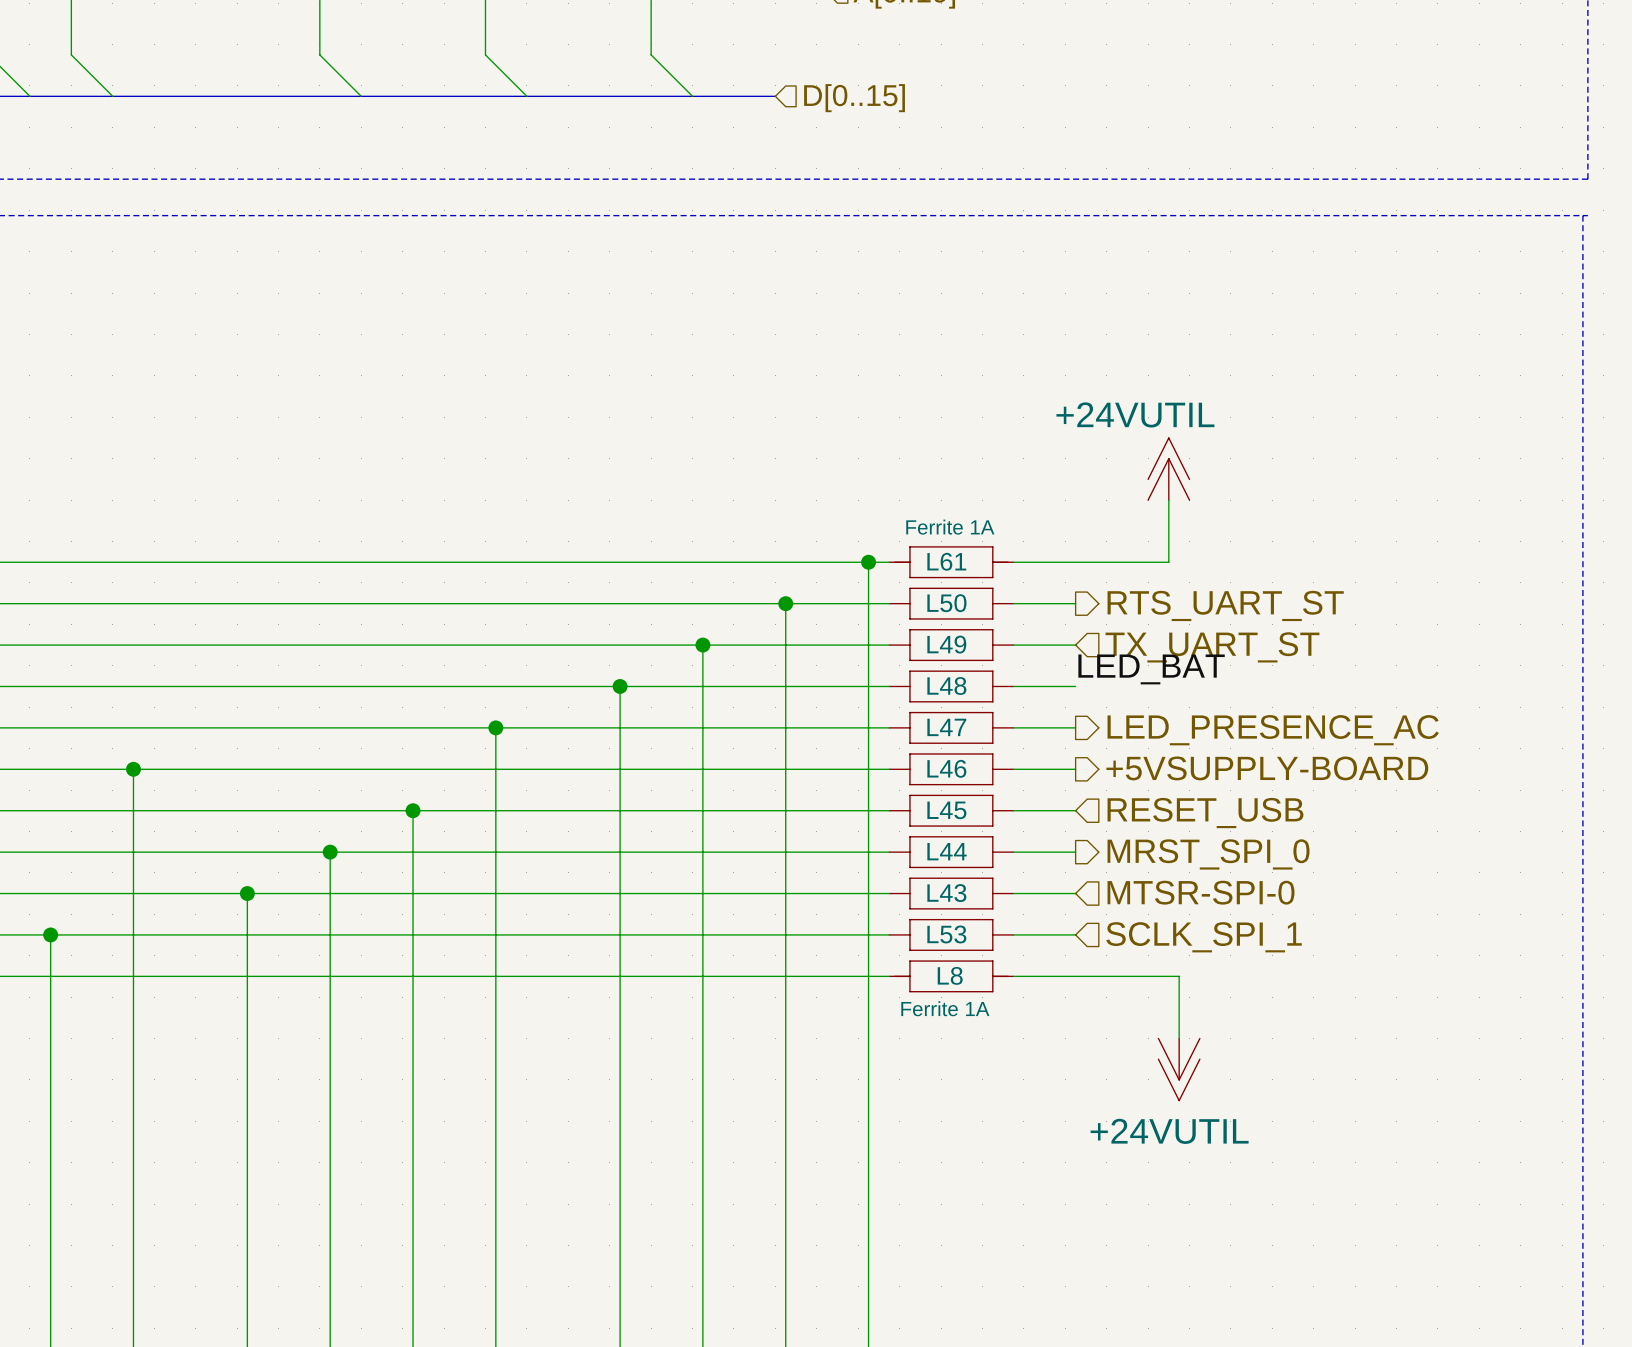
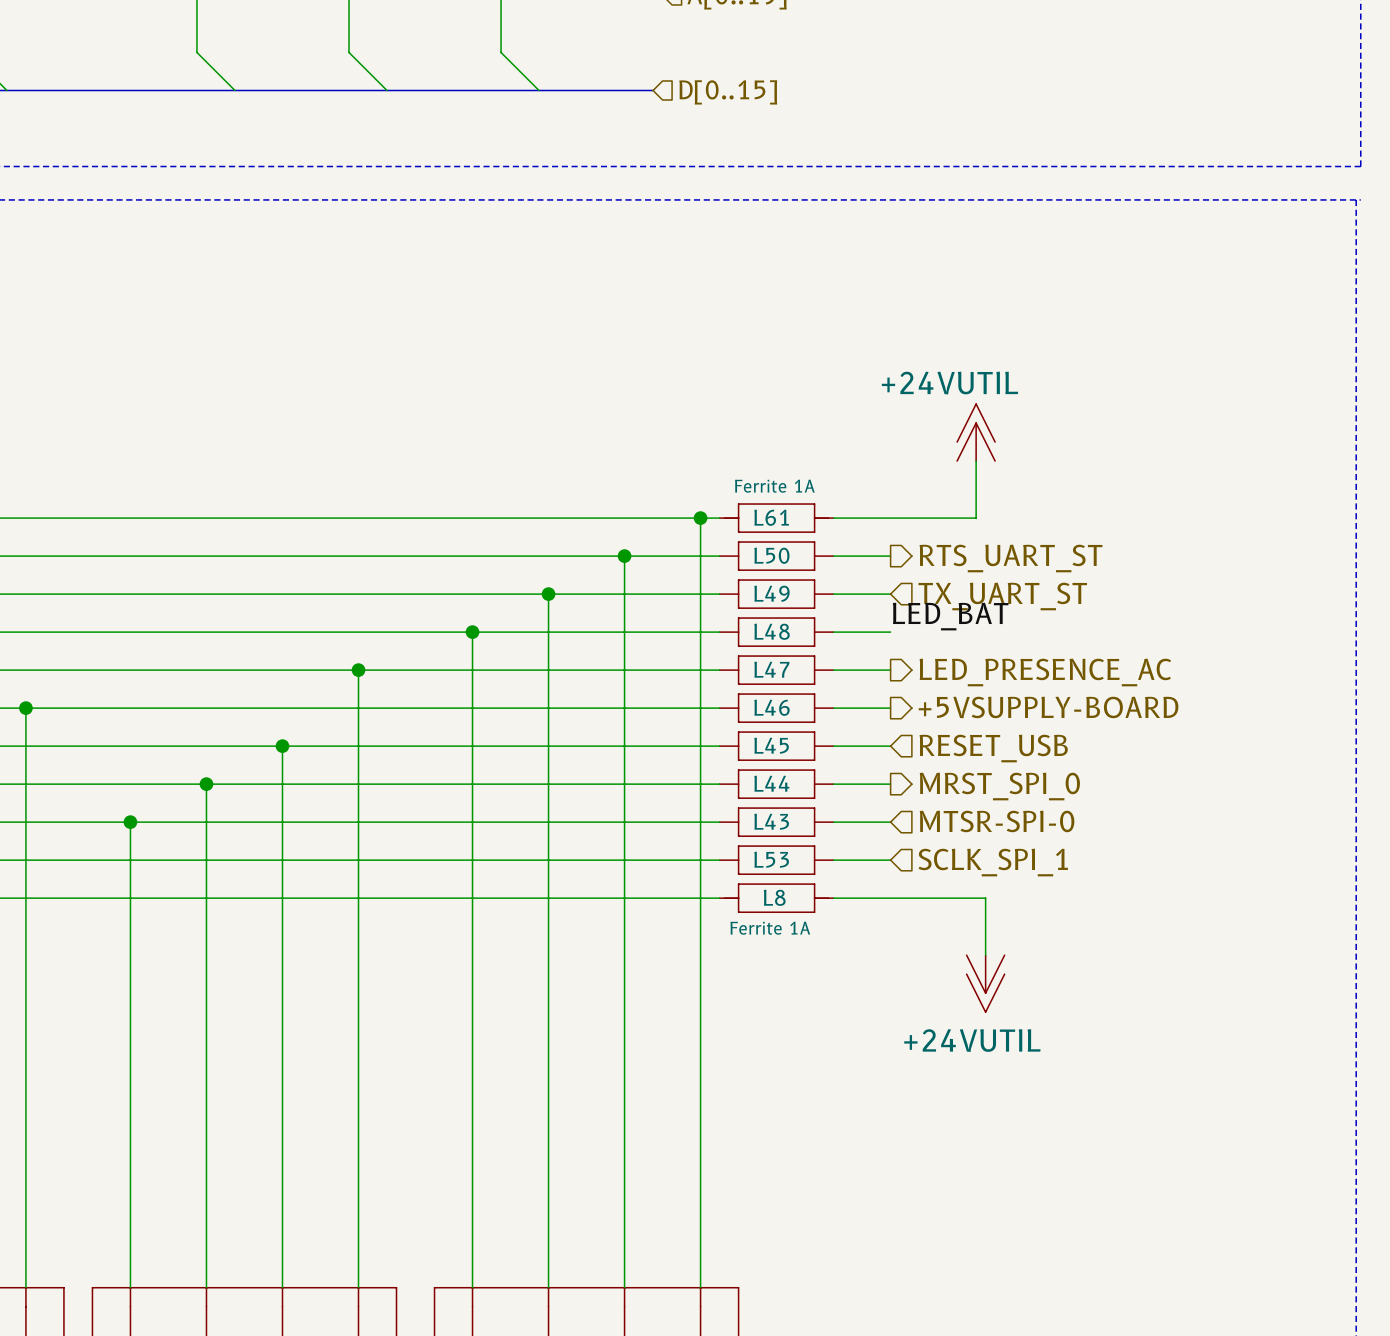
bus: none -> (615, 90) (653, 90)
hierarchical label position: D[0..15] (854, 98) -> D[0..15] (728, 92)

